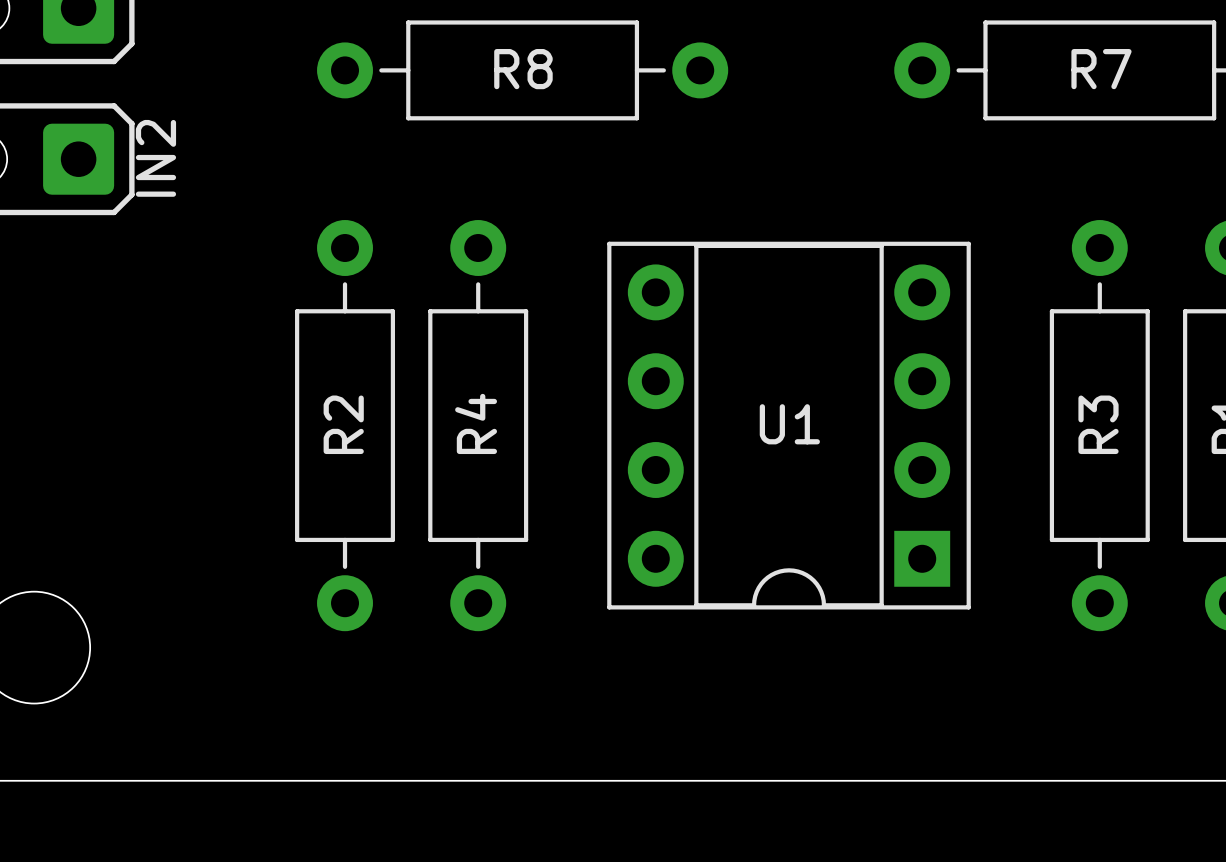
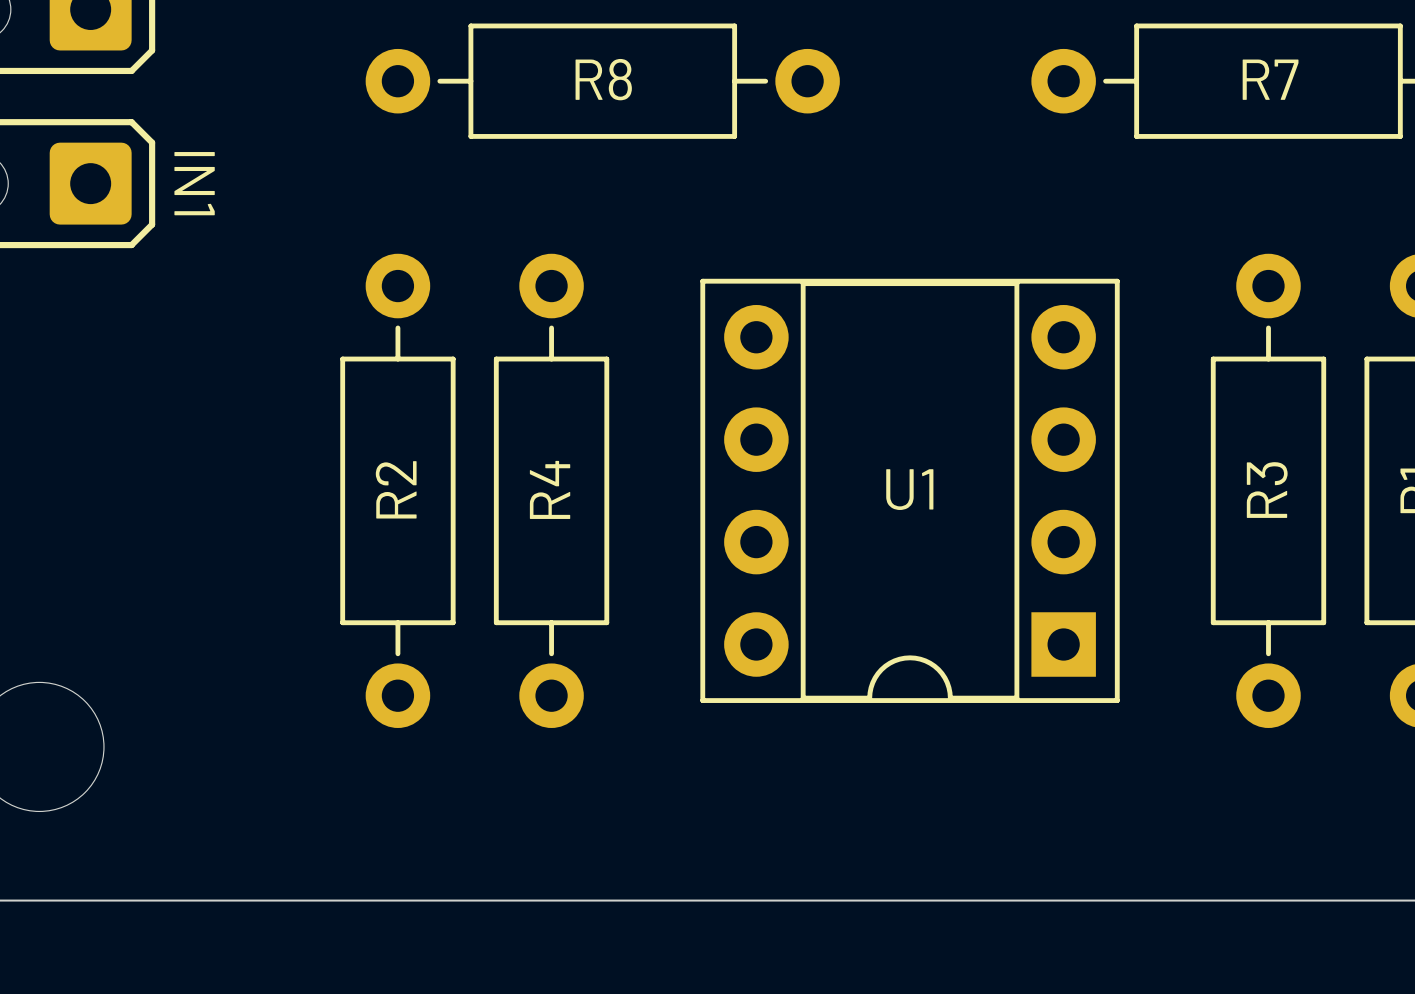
IN2 name: IN2 (155, 158) -> none
text: none -> IN1 (194, 183)

